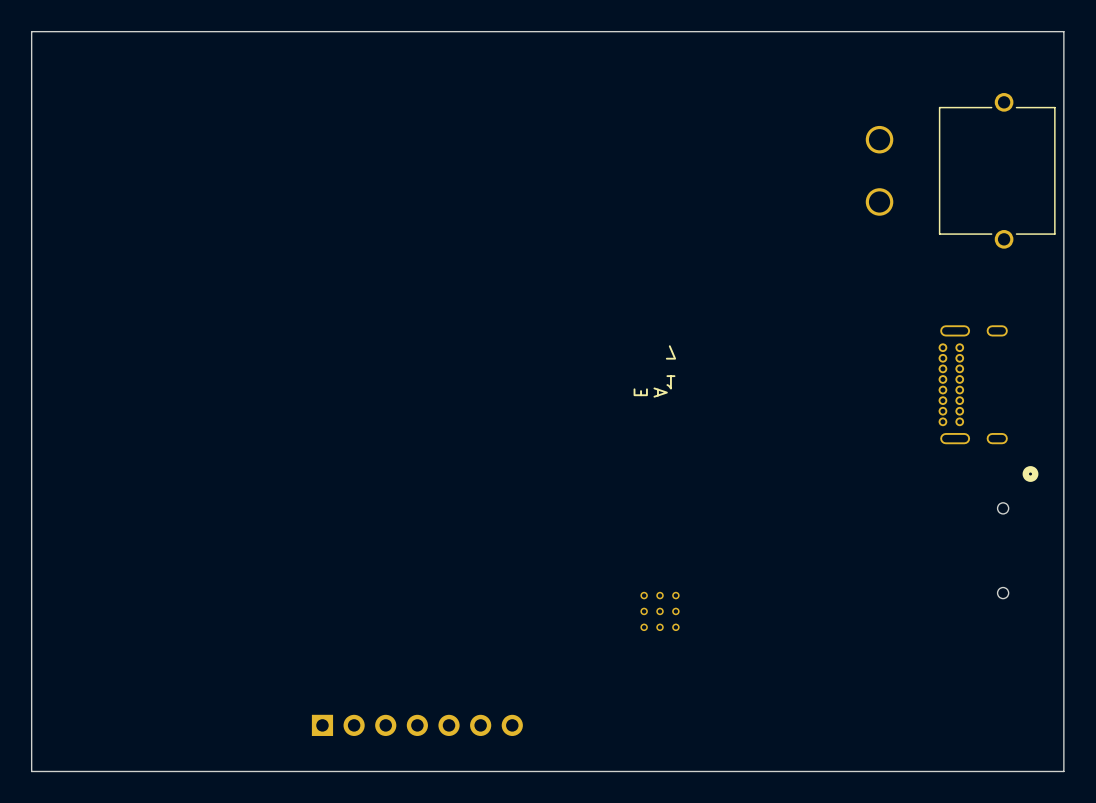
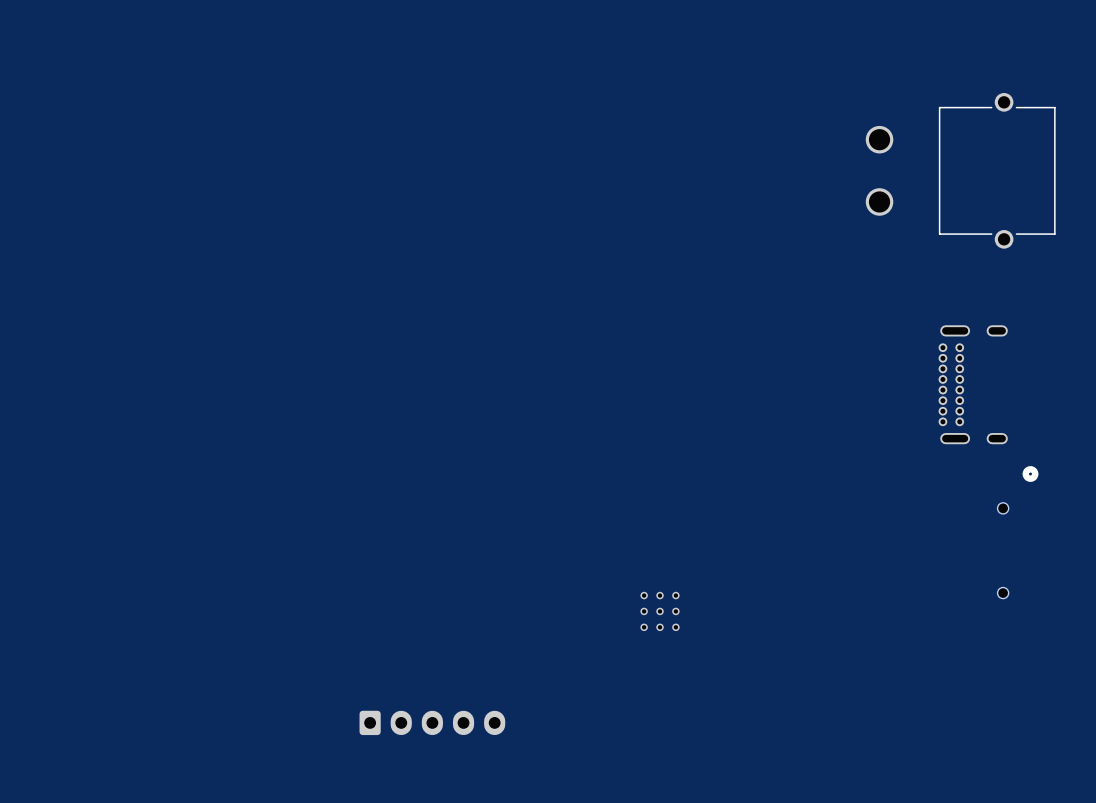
board edge: (1063, 31) (31, 31) (31, 771) (1063, 771) (1063, 31) -> none
part: (654, 371) -> none
part: none -> (432, 722)
part: (417, 725) -> none

